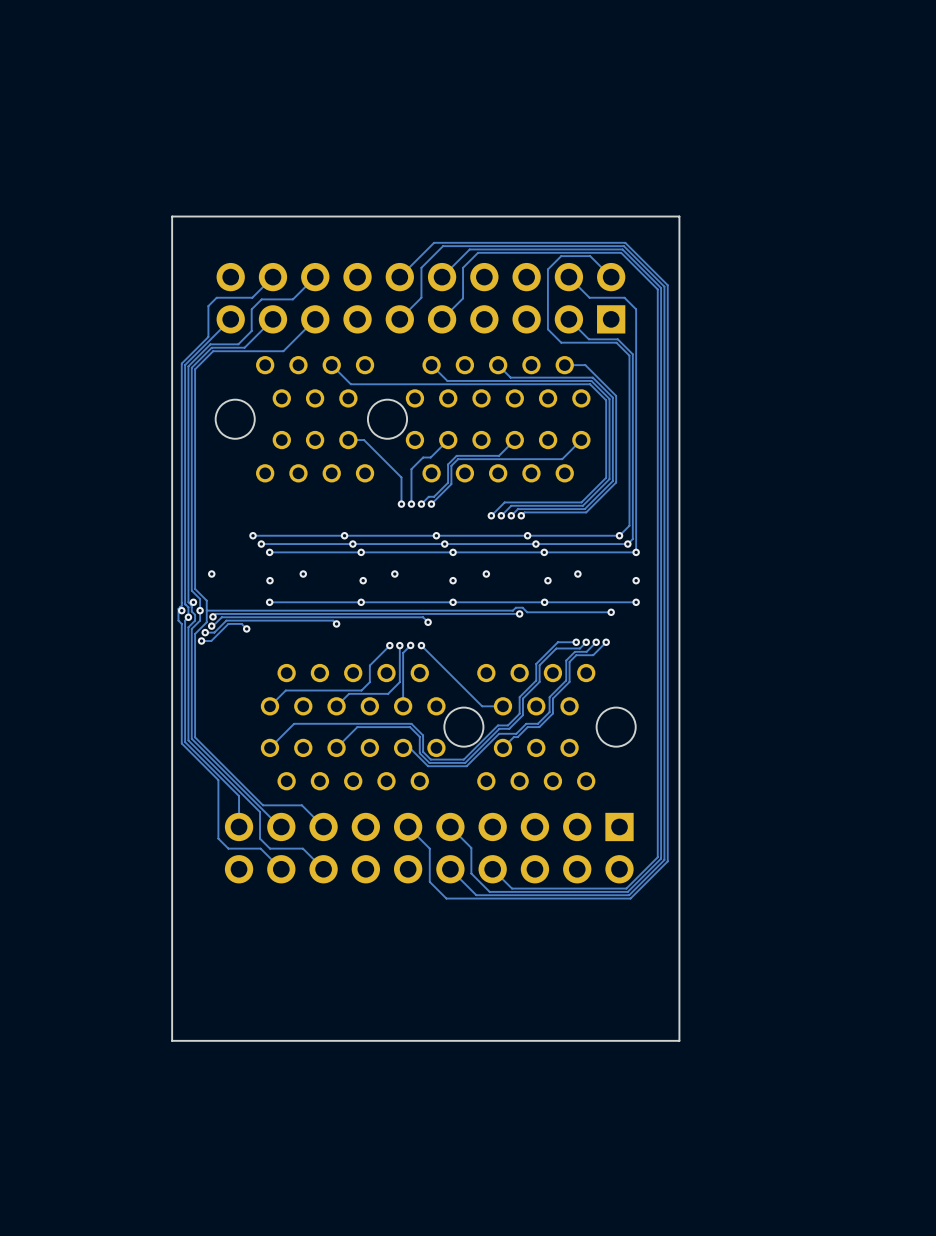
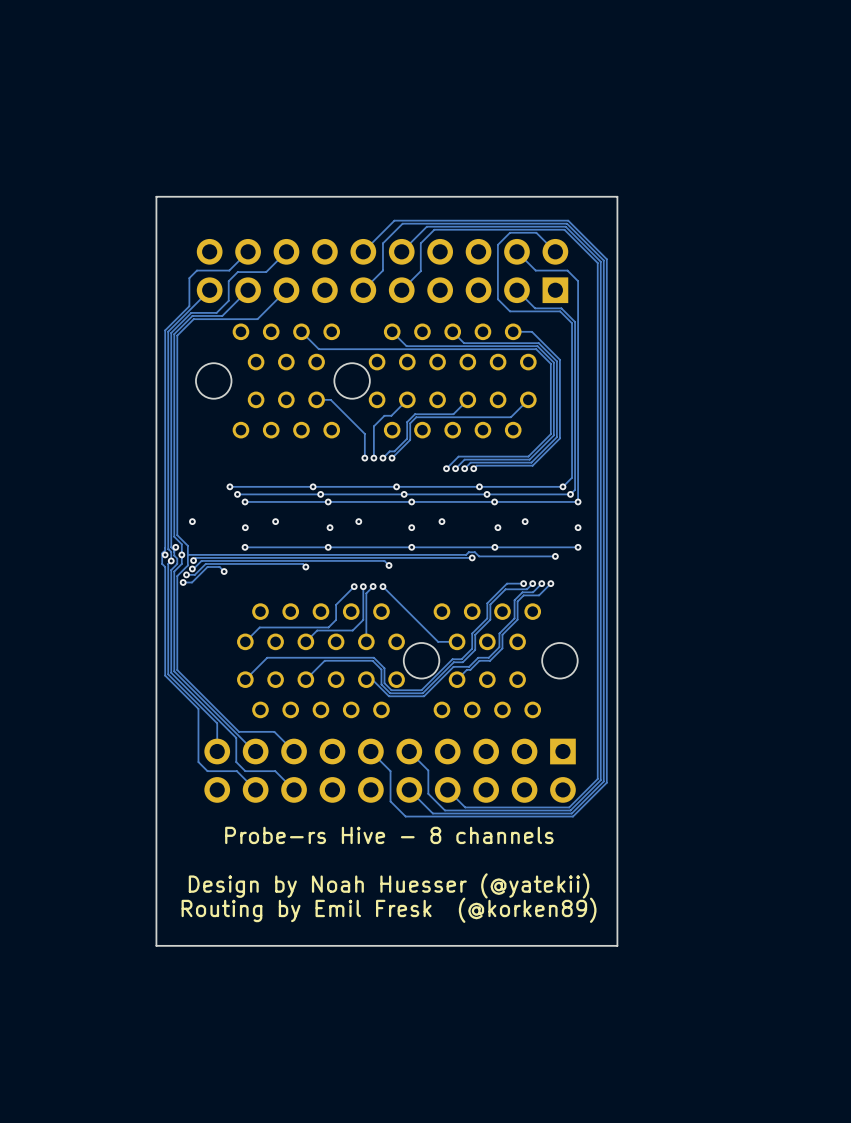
text: none -> Probe-rs Hive - 8 channels (389, 835)
text: none -> Design by Noah Huesser (@yatekii) (389, 885)
text: none -> Routing by Emil Fresk (@korken89) (389, 910)

